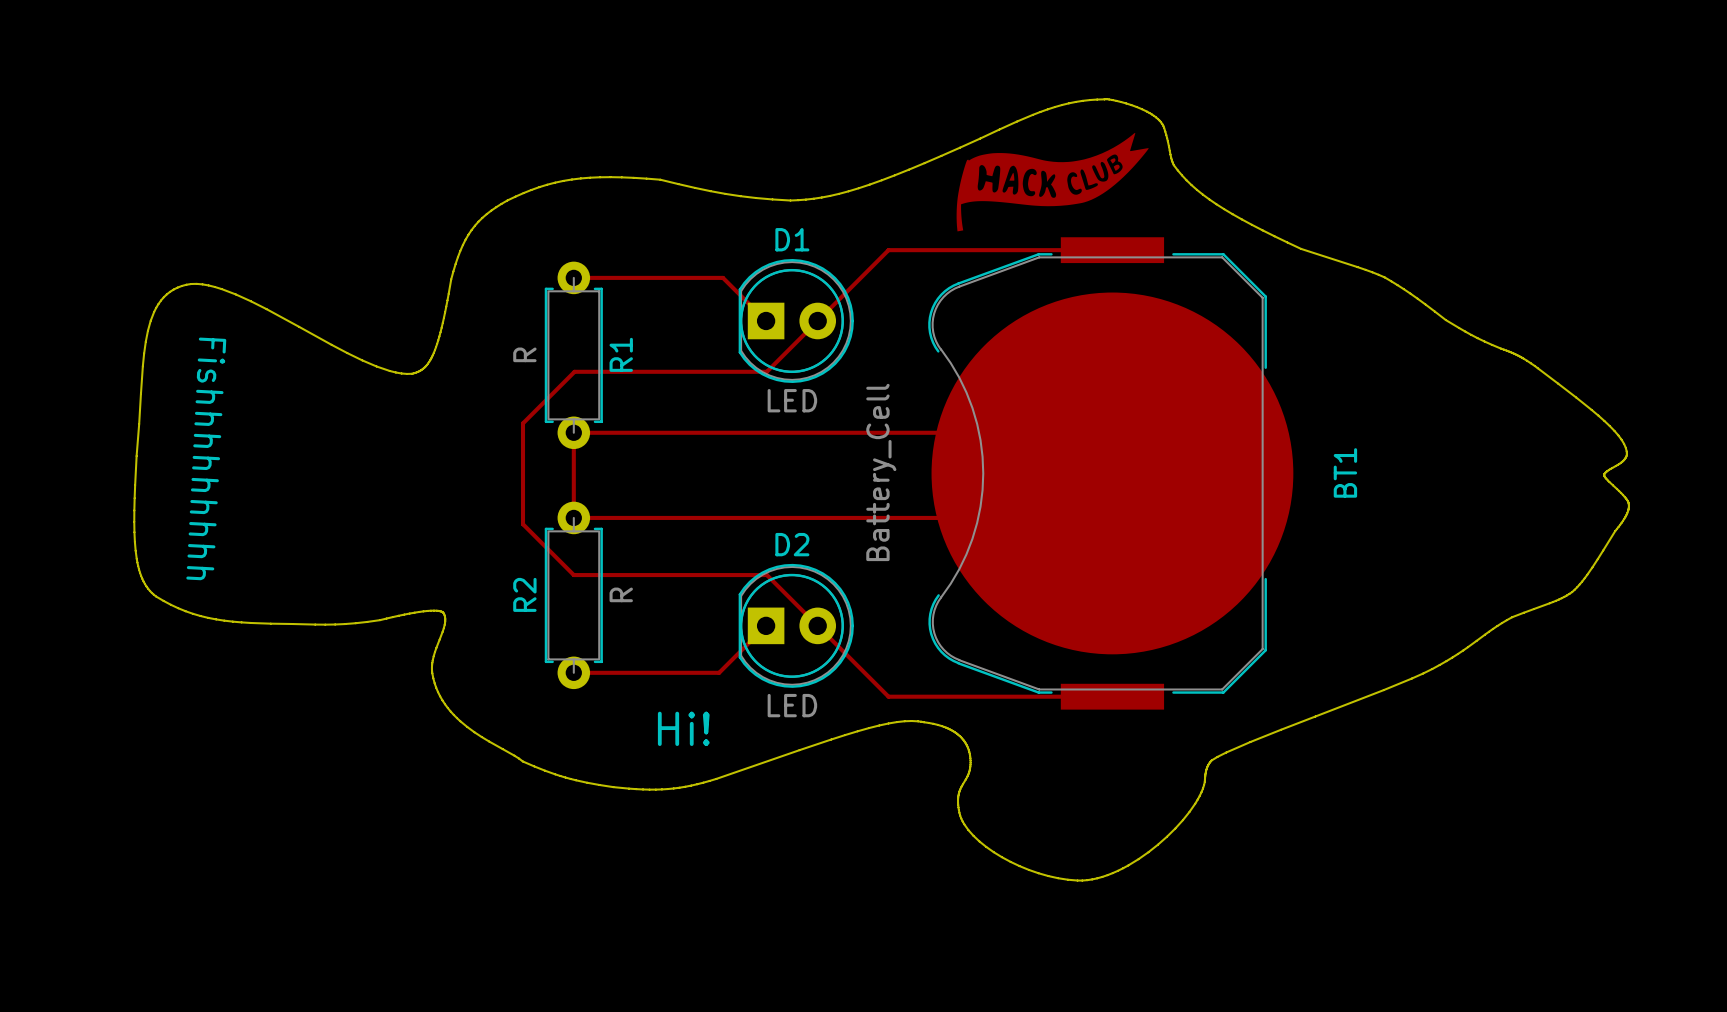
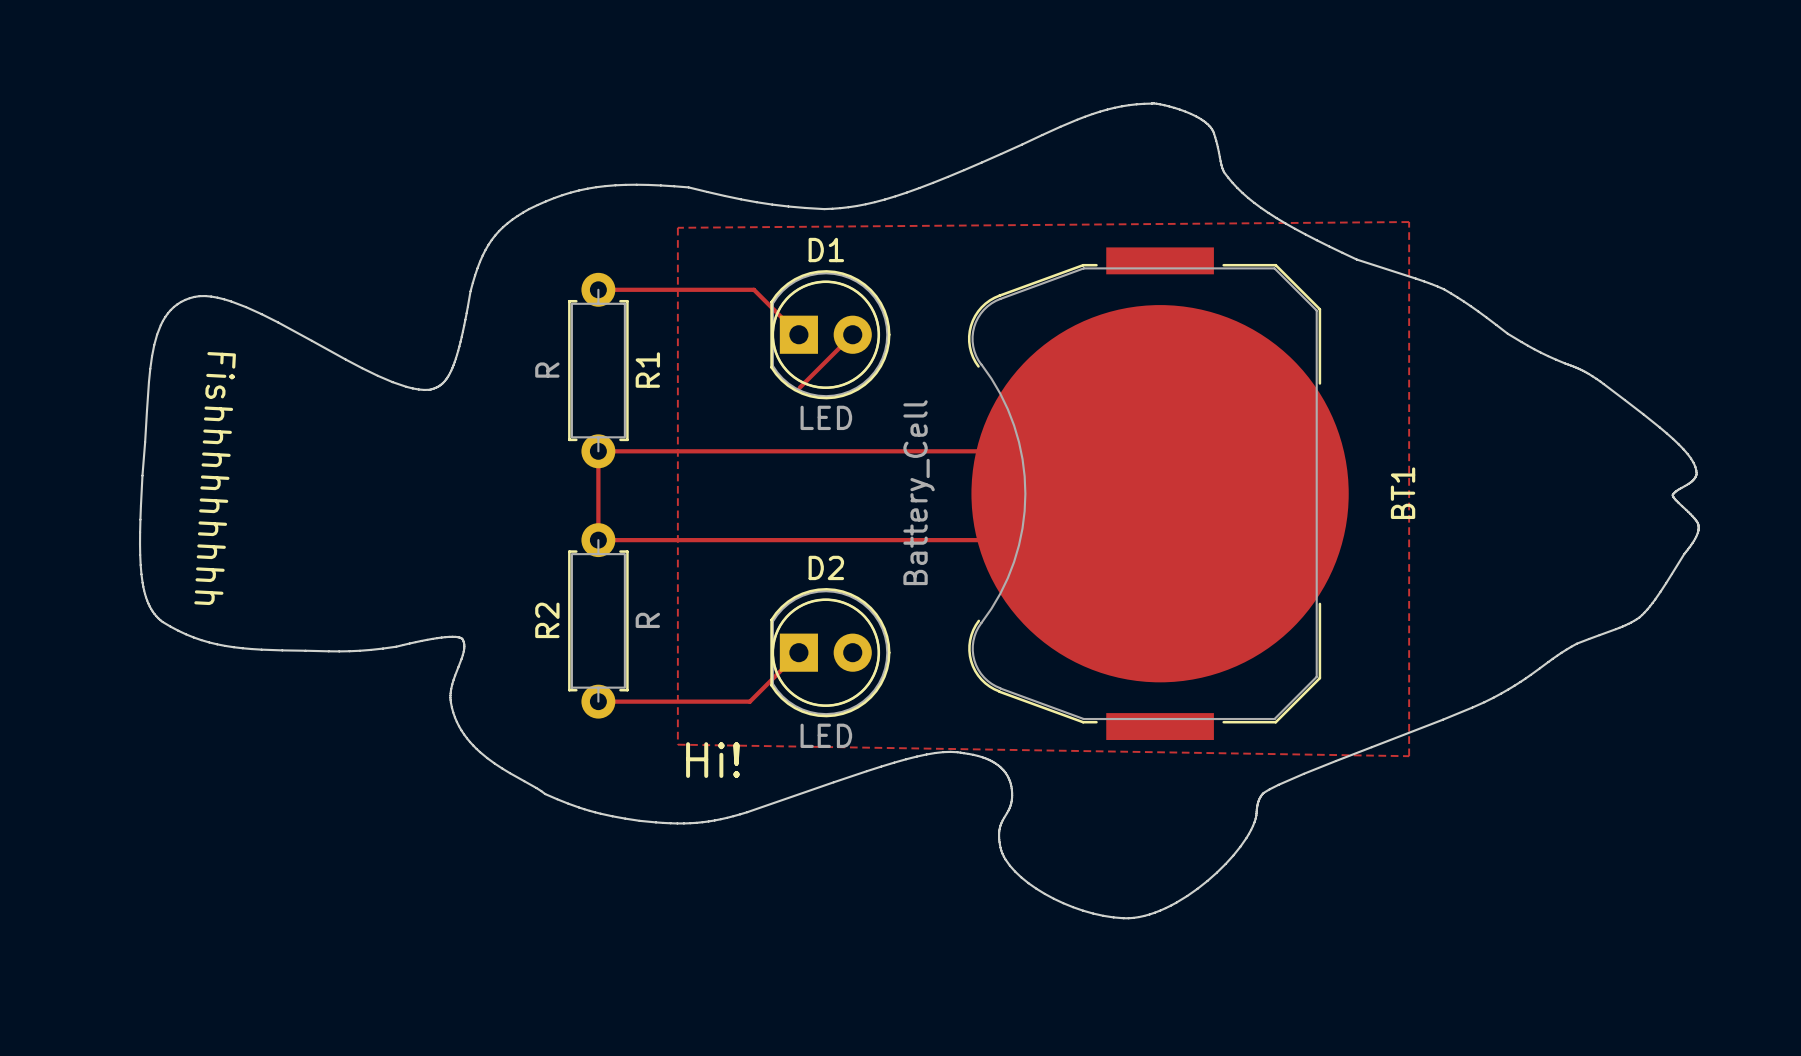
drawing: [956, 132, 1149, 232] -> none
zone outline: none -> (1409, 222) (677, 227) (677, 744) (1409, 756) (1409, 222)
track: (1112, 250) (888, 250) (817, 320) -> none
track: (766, 371) (574, 371) (523, 423) (523, 524) (573, 575) (766, 575) (888, 696) (1112, 696) -> none

